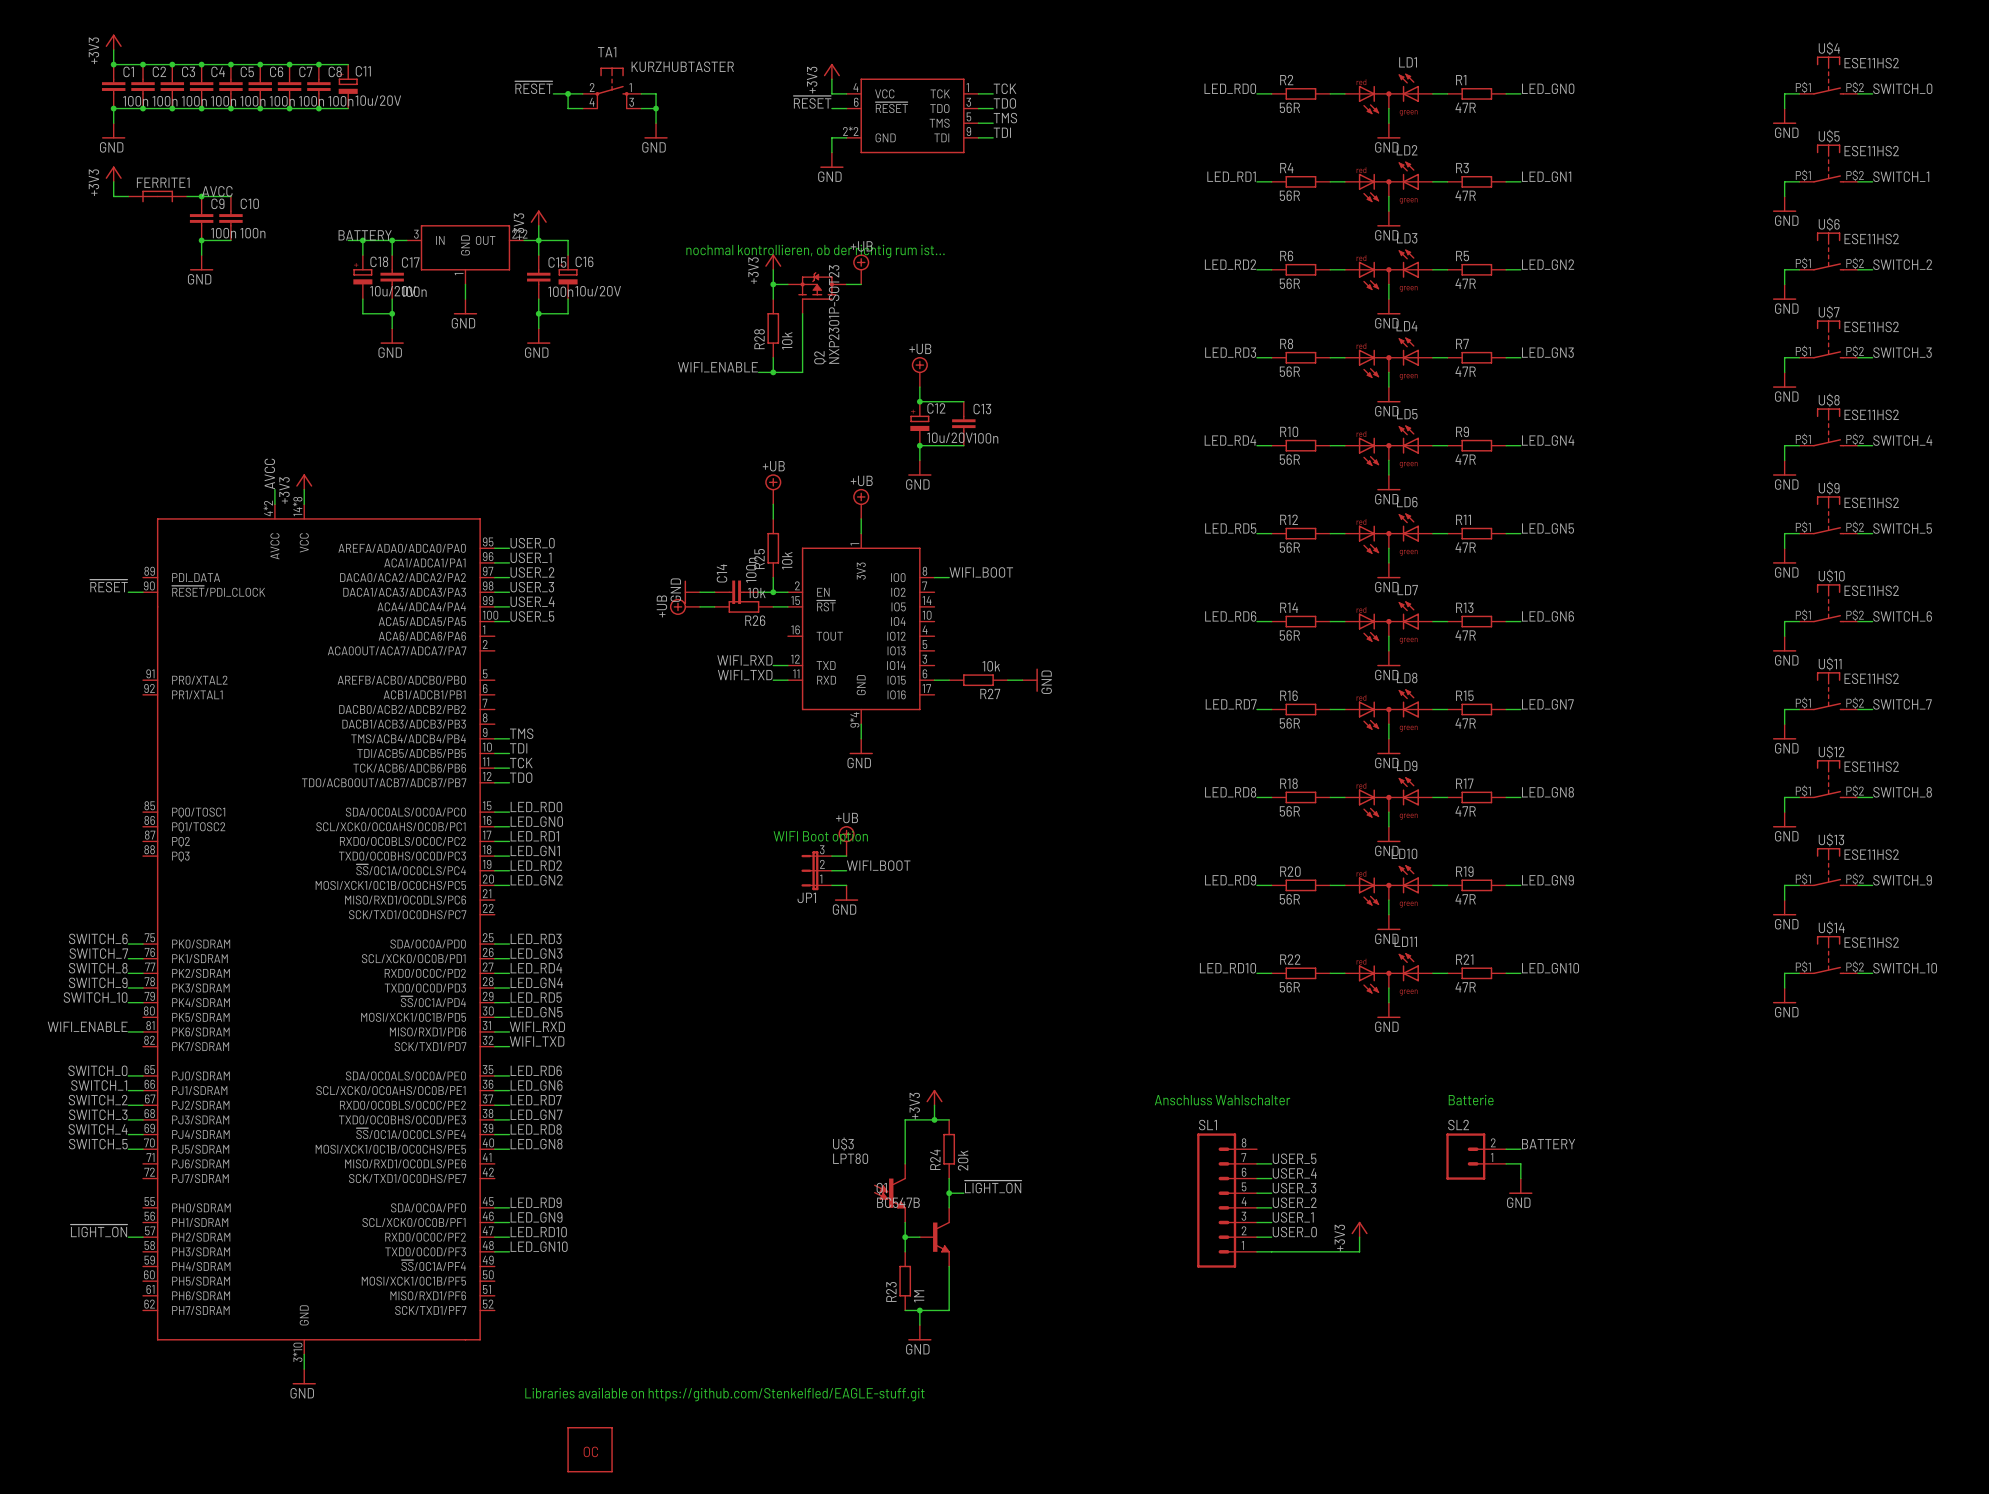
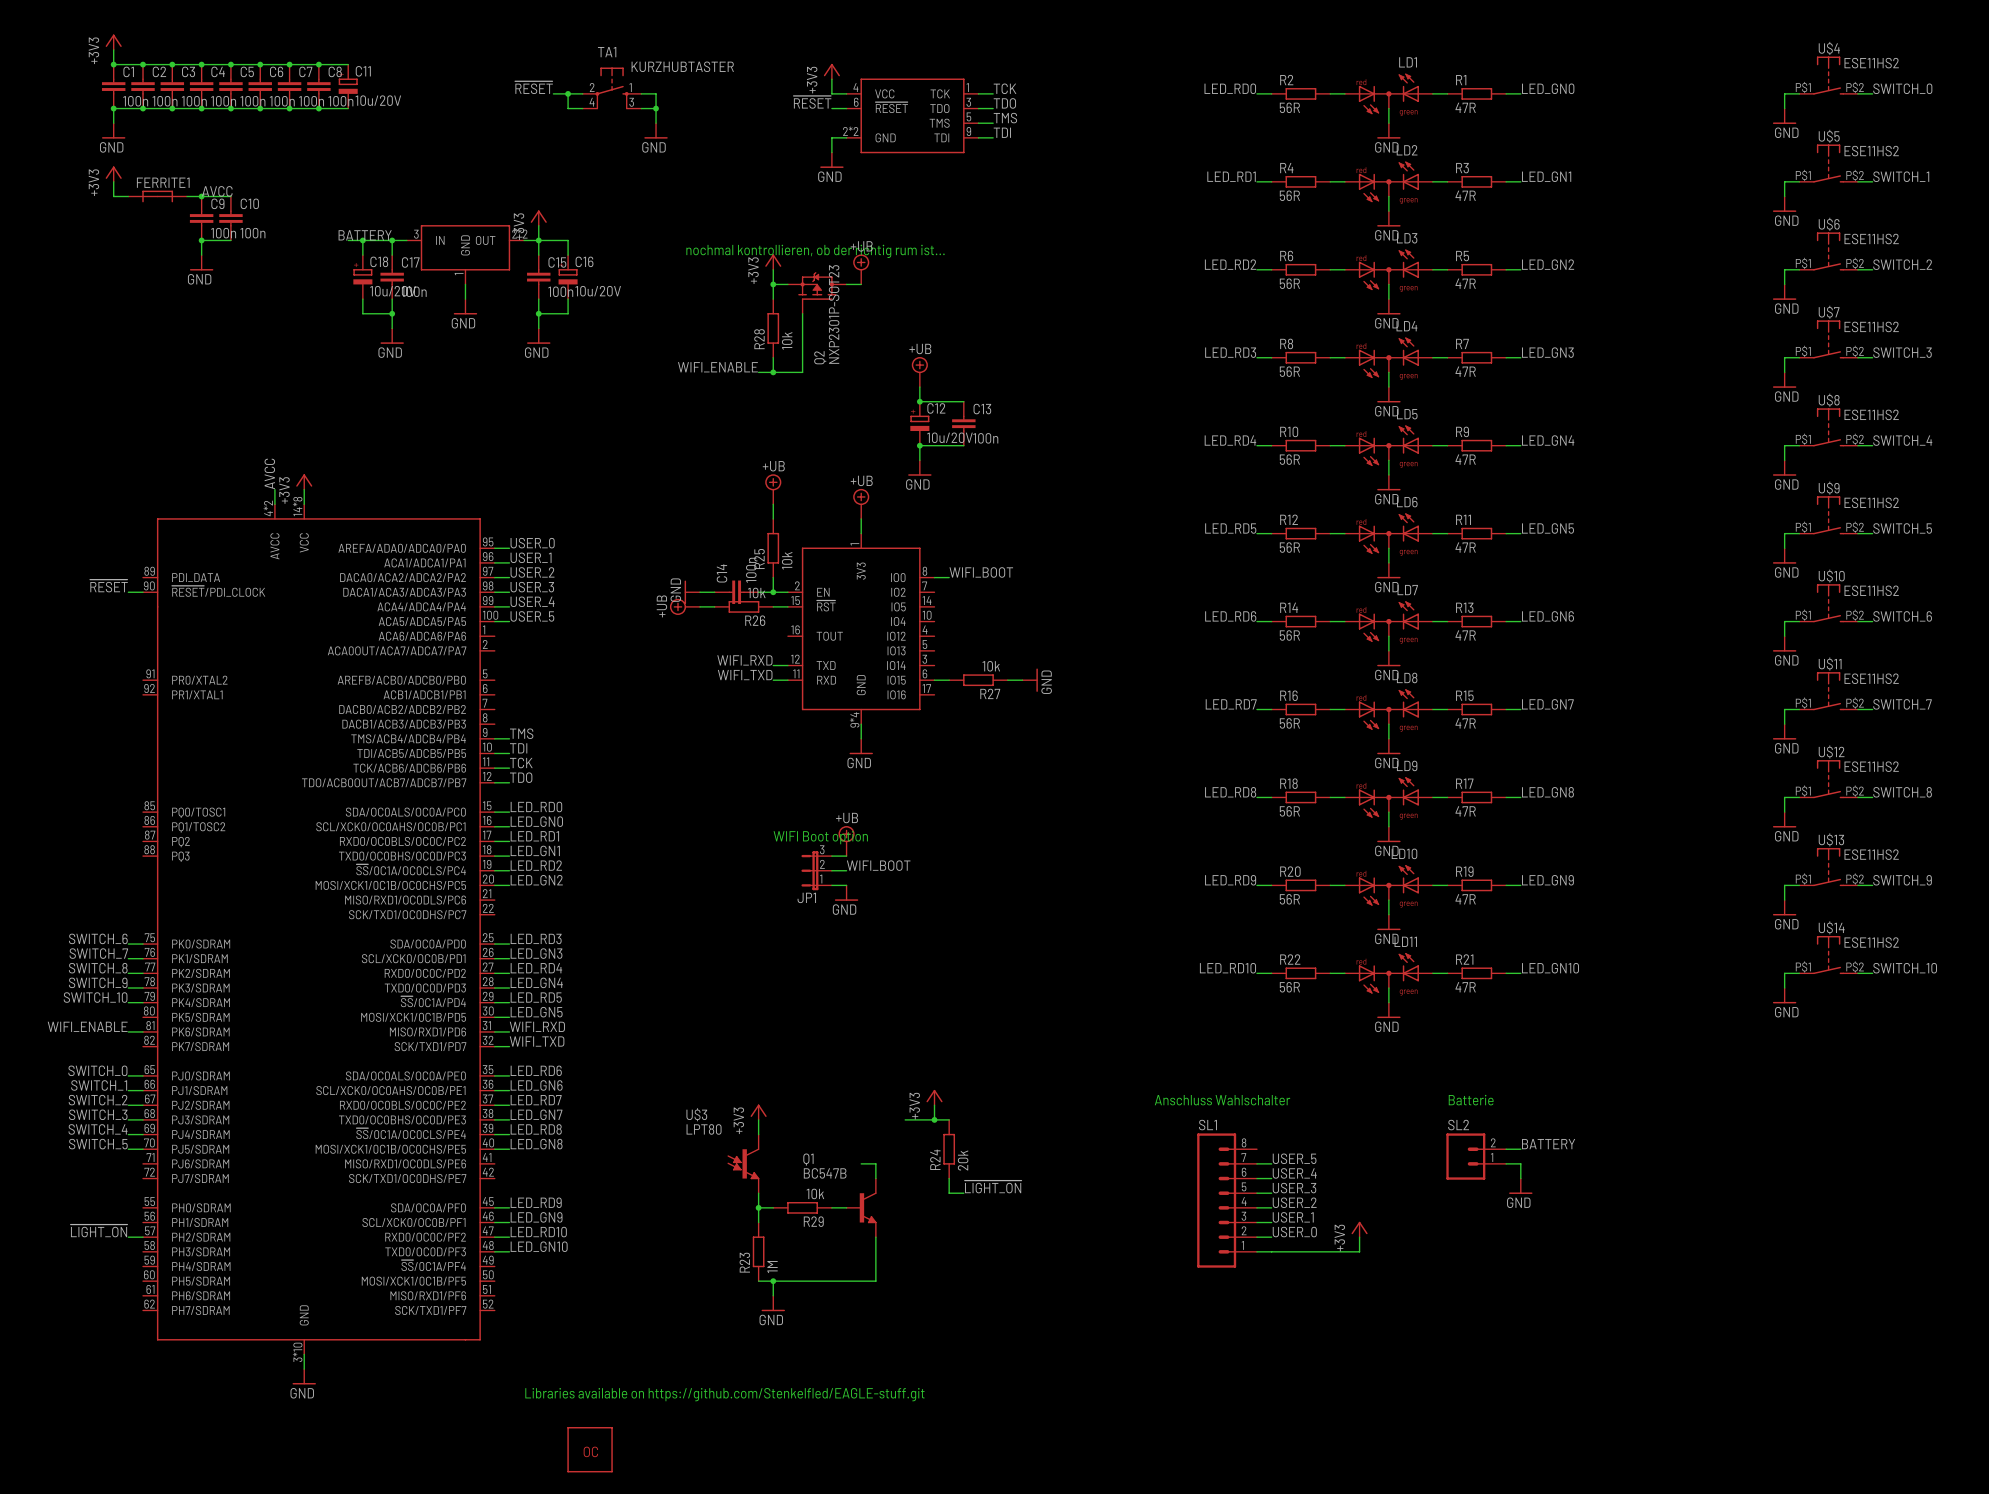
power symbol: none -> +3V3 (758, 1112)
wire: none -> (758, 1119) (758, 1134)
wire: (905, 1119) (905, 1163) -> none
wire: none -> (861, 1163) (875, 1163) (875, 1178)
wire: none -> (758, 1193) (758, 1222)
U$3 position: (889, 1193) -> (743, 1163)
wire: (949, 1193) (949, 1207) -> none
junction: (949, 1193) -> none
wire: none -> (758, 1207) (773, 1207)
junction: none -> (758, 1207)
R29: none -> 10k (802, 1207)
wire: (905, 1222) (905, 1251) -> none
wire: none -> (875, 1237) (875, 1281) (758, 1281)
wire: (905, 1237) (919, 1237) -> (831, 1207) (846, 1207)
junction: (905, 1237) -> none
Q1 position: (934, 1237) -> (861, 1207)
wire: (949, 1266) (949, 1310) (905, 1310) -> none
wire: none -> (773, 1281) (773, 1295)
junction: none -> (773, 1281)
R23 position: (905, 1281) -> (758, 1251)
power symbol: none -> GND (773, 1303)
wire: (919, 1310) (919, 1325) -> none
junction: (919, 1310) -> none
power symbol: GND (919, 1332) -> none

